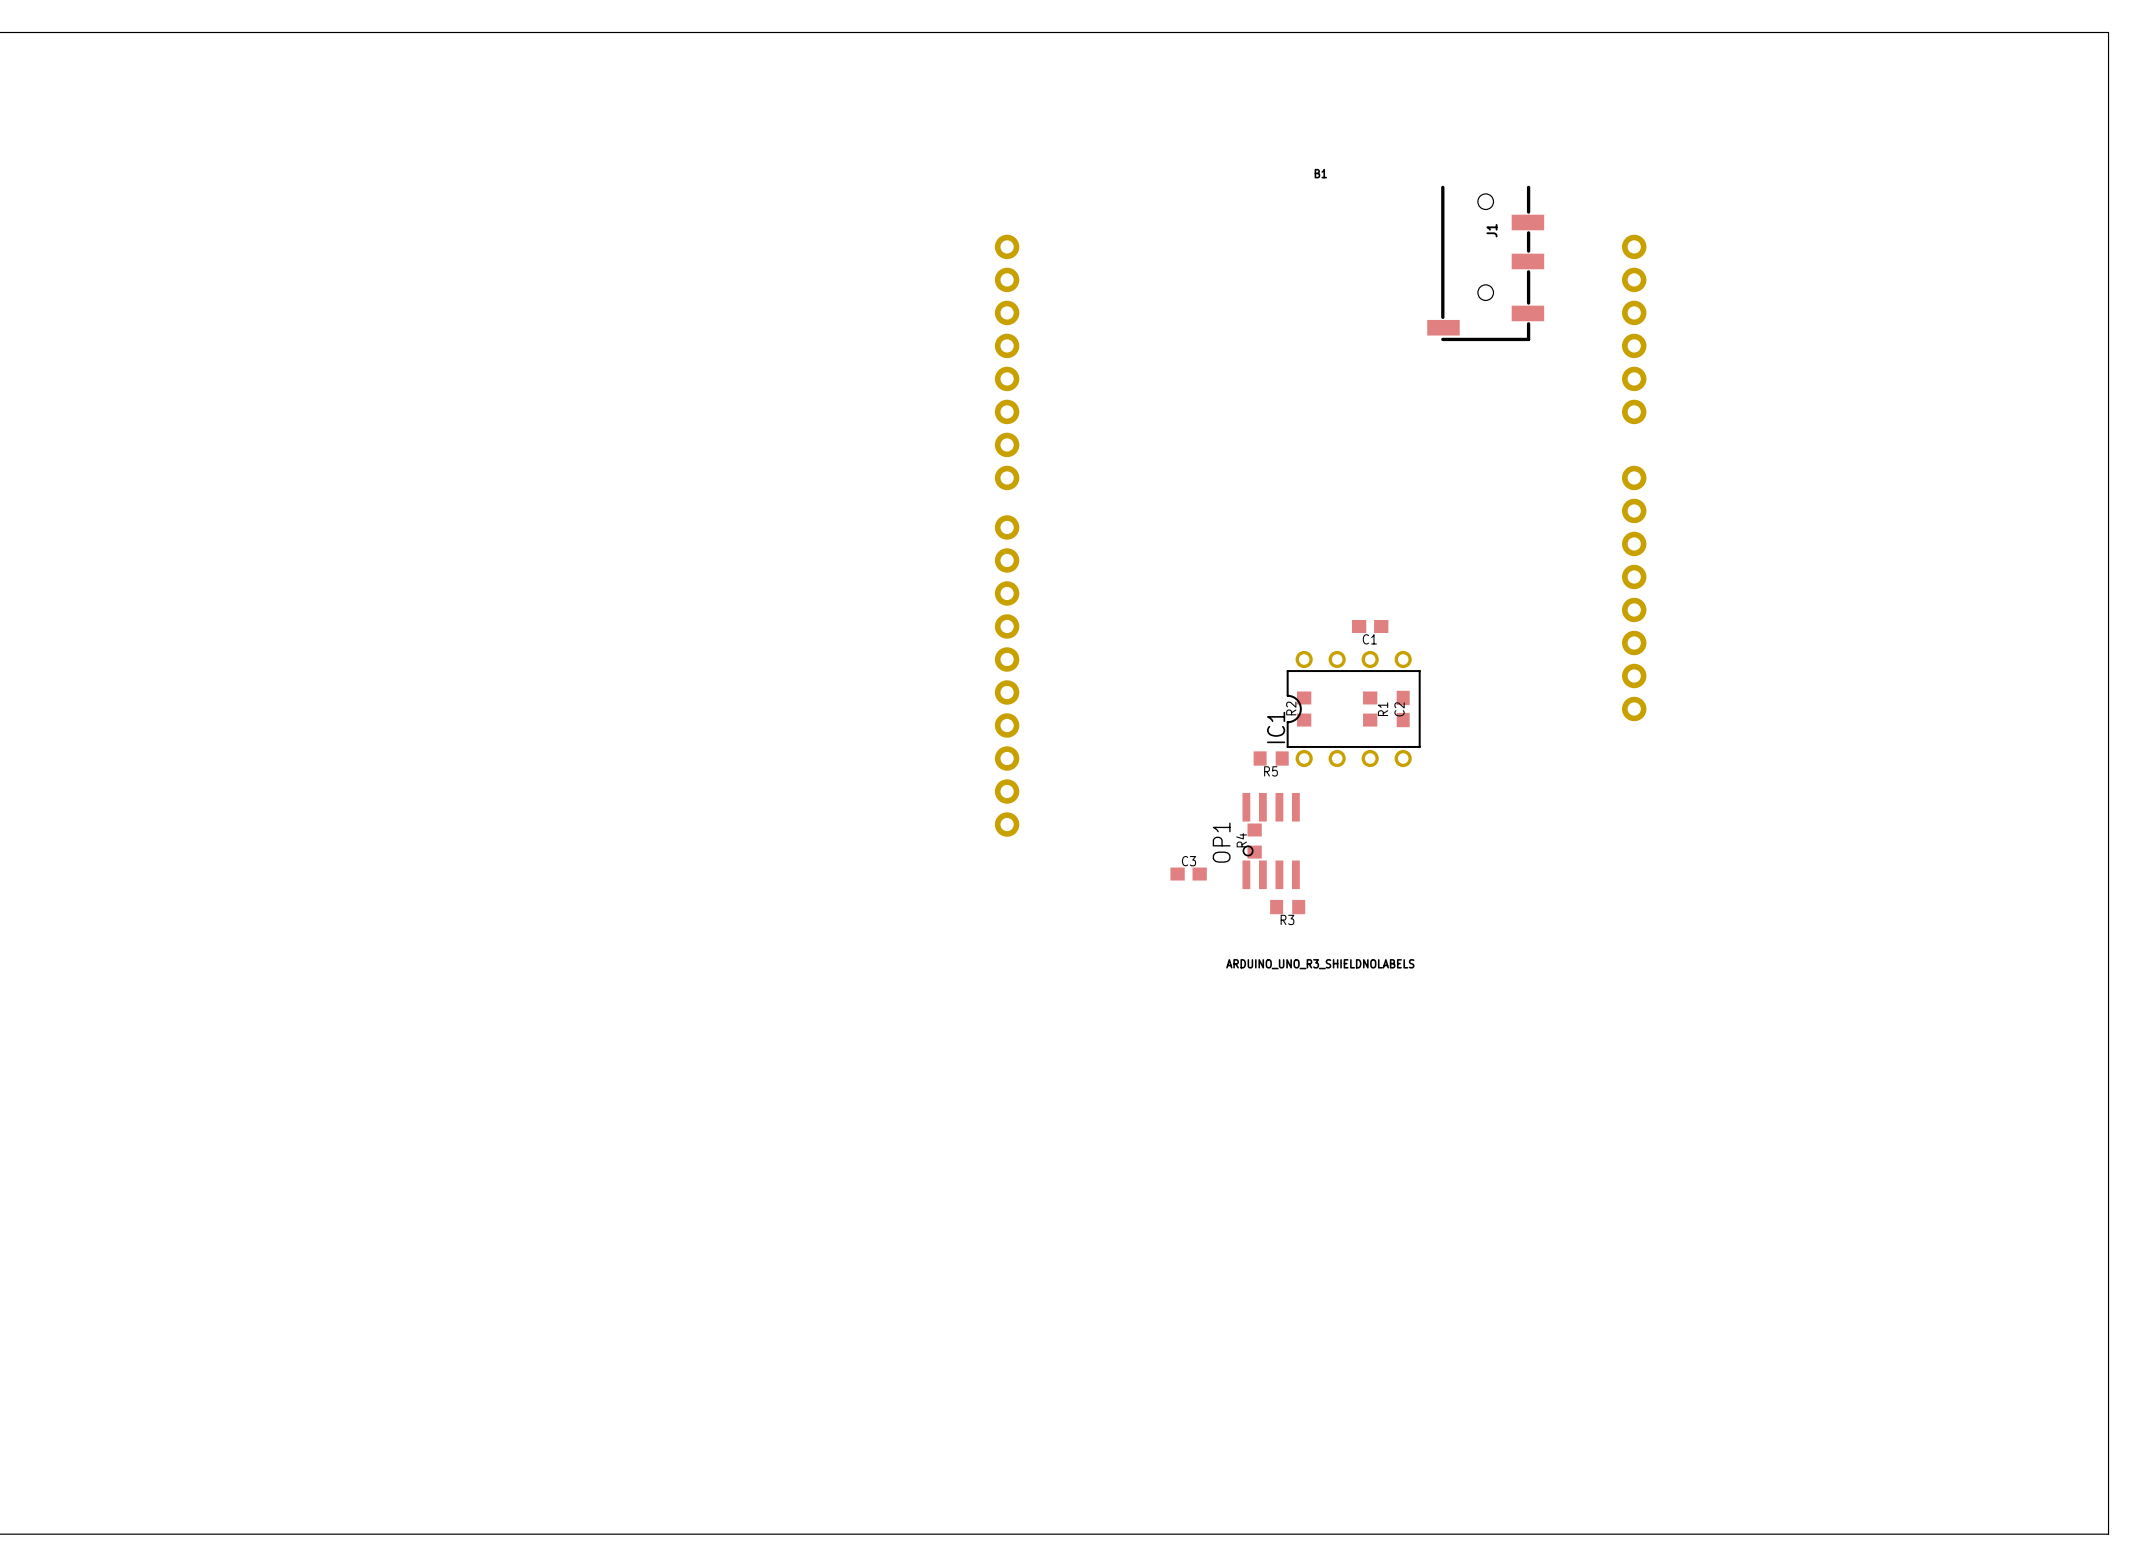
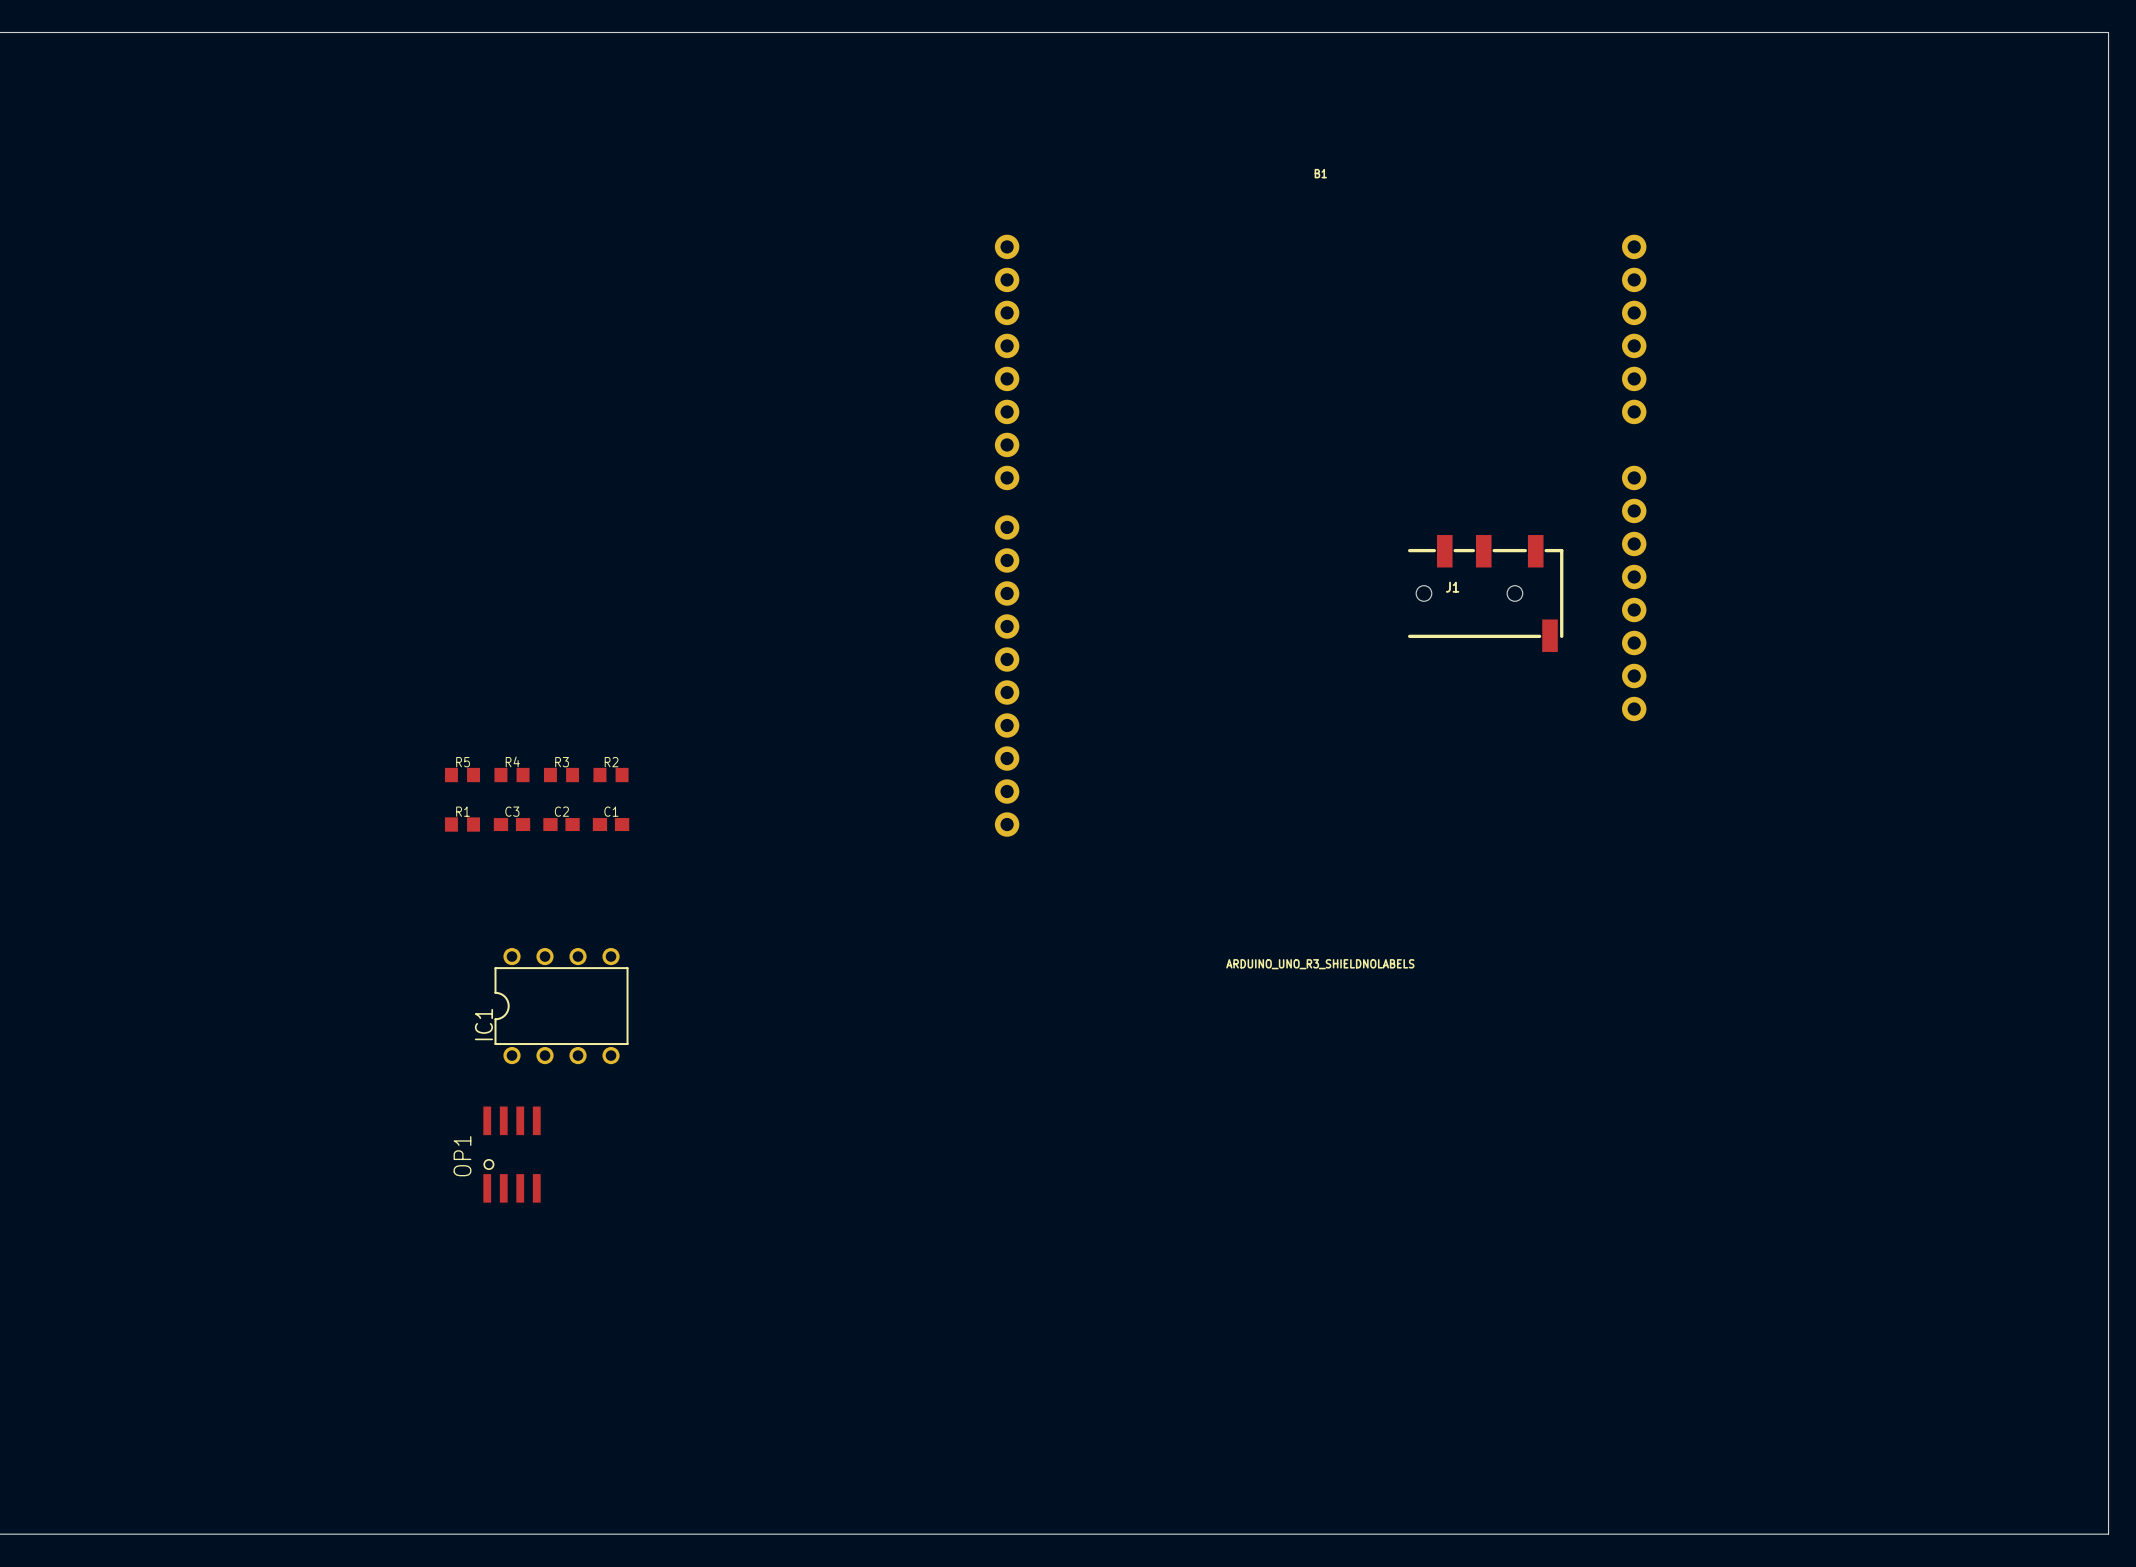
J1 rotation: 0° (1485, 263) -> 90° counterclockwise (1485, 593)
J1 position: (1485, 263) -> (1485, 593)
C1 position: (1370, 626) -> (611, 824)
C1 name position: C1 (1369, 639) -> C1 (611, 811)
R2 rotation: 0° (1304, 709) -> 90° clockwise (611, 775)
R2 position: (1304, 709) -> (611, 775)
IC1 position: (1353, 709) -> (561, 1006)
R1 rotation: 0° (1370, 709) -> 90° clockwise (462, 824)
R1 position: (1370, 709) -> (462, 824)
C2 rotation: 0° (1403, 709) -> 90° clockwise (561, 824)
C2 position: (1403, 709) -> (561, 824)
R5 position: (1271, 758) -> (462, 775)
R5 name position: R5 (1271, 771) -> R5 (463, 762)
R4 rotation: 0° (1254, 841) -> 90° clockwise (512, 775)
R4 position: (1254, 841) -> (512, 775)
OP1 position: (1271, 841) -> (512, 1154)
C3 position: (1188, 874) -> (512, 824)
R3 position: (1287, 907) -> (561, 775)
R3 name position: R3 (1287, 919) -> R3 (562, 762)

